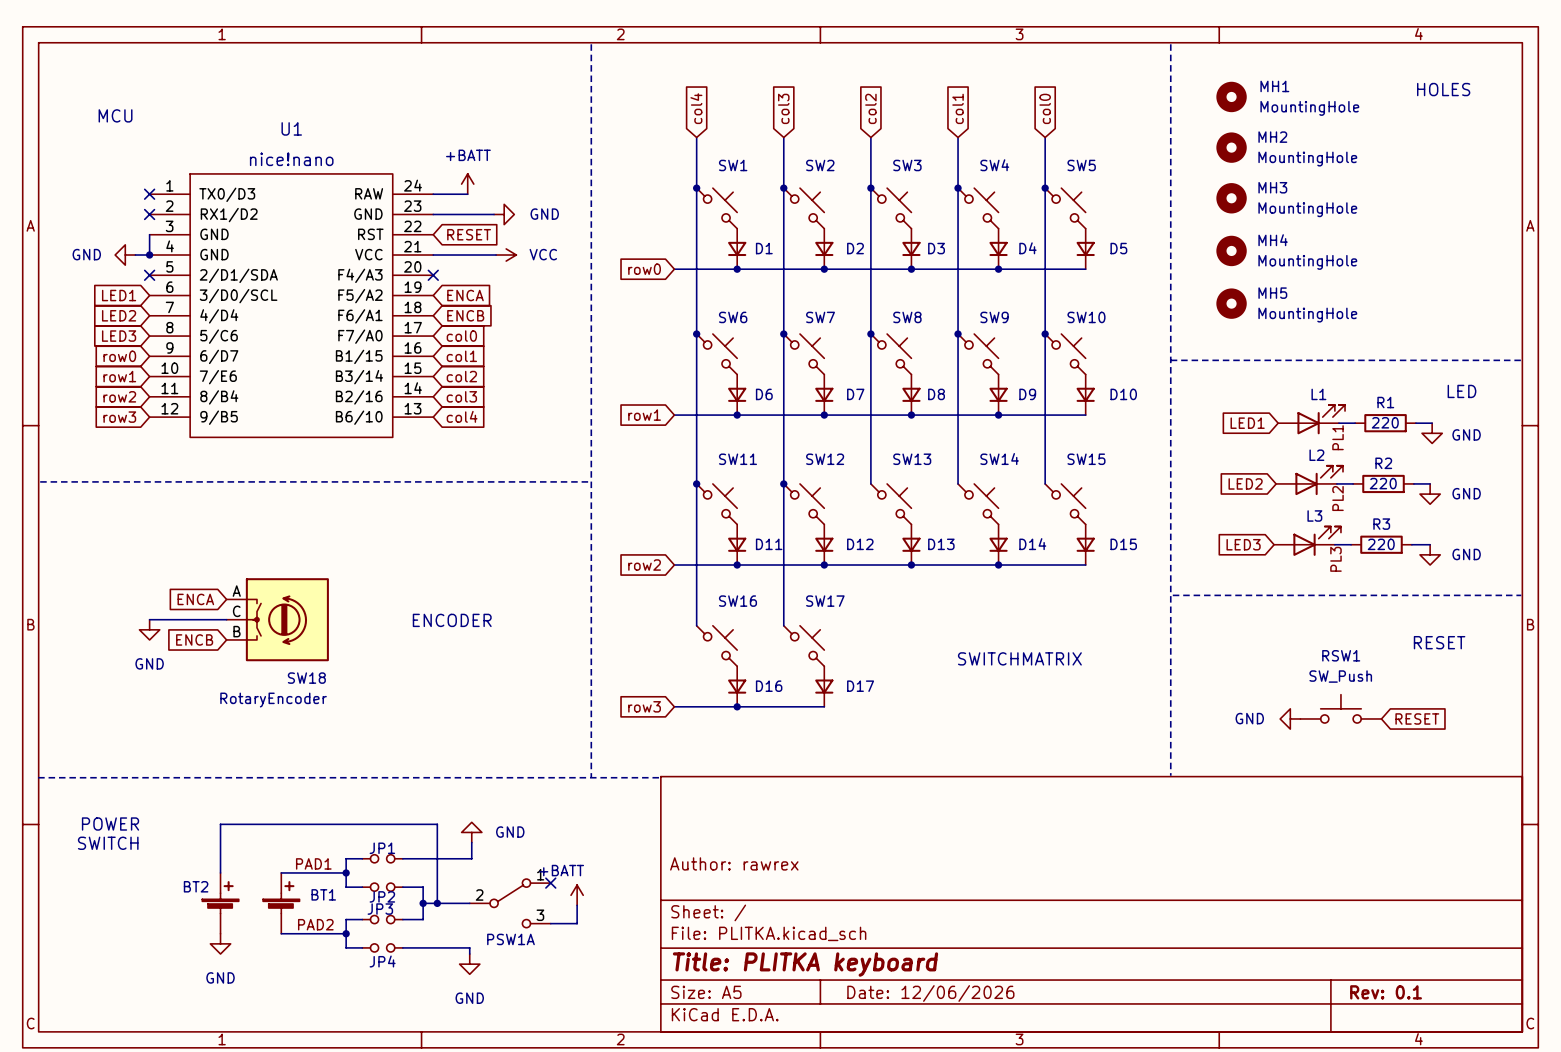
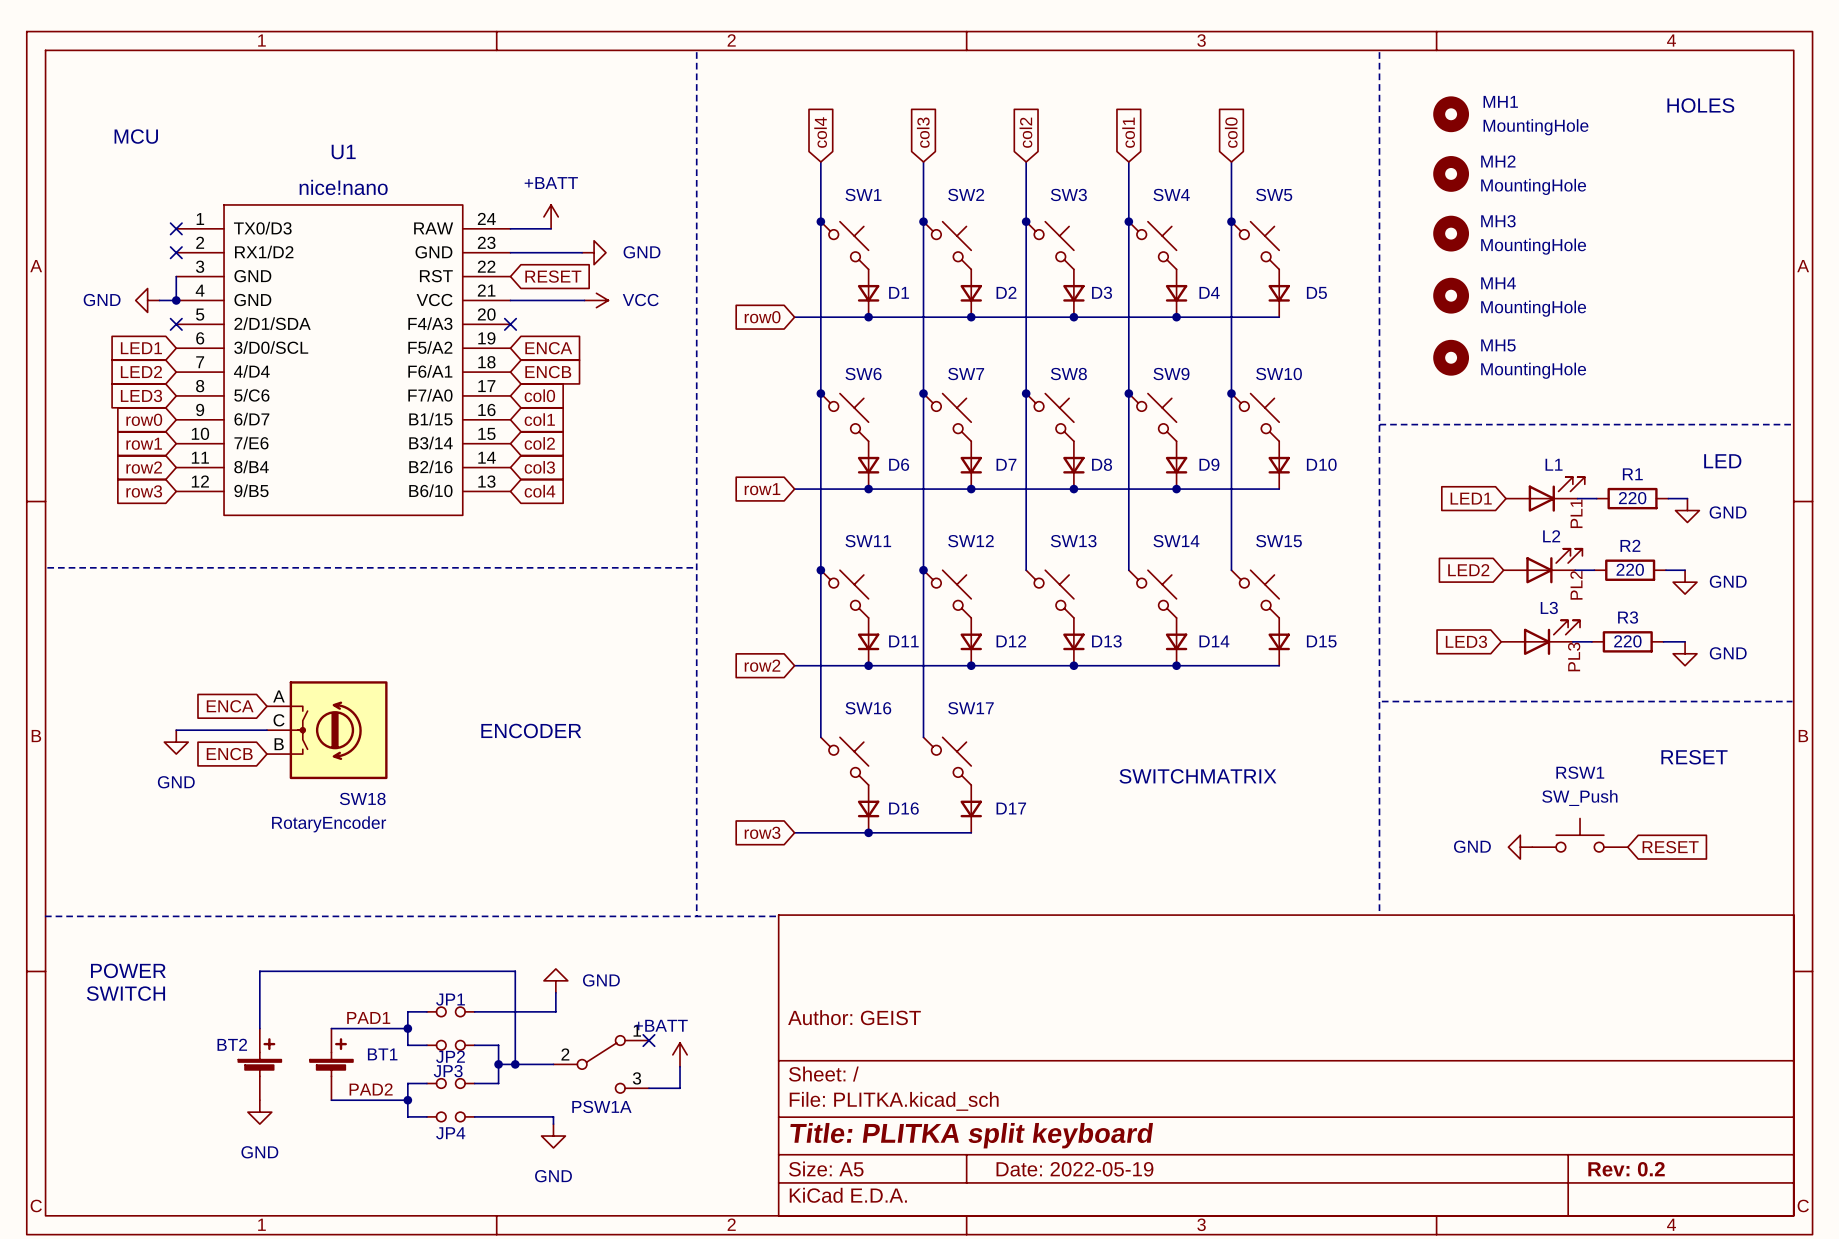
title block: Author: rawrex (734, 863) -> Author: GEIST (854, 1017)
title block: Title: PLITKA keyboard (805, 964) -> Title: PLITKA split keyboard (971, 1135)
title block: Rev: 0.1 (1386, 992) -> Rev: 0.2 (1626, 1169)
title block: Date: 12/06/2026 (930, 993) -> Date: 2022-05-19 (1074, 1169)

